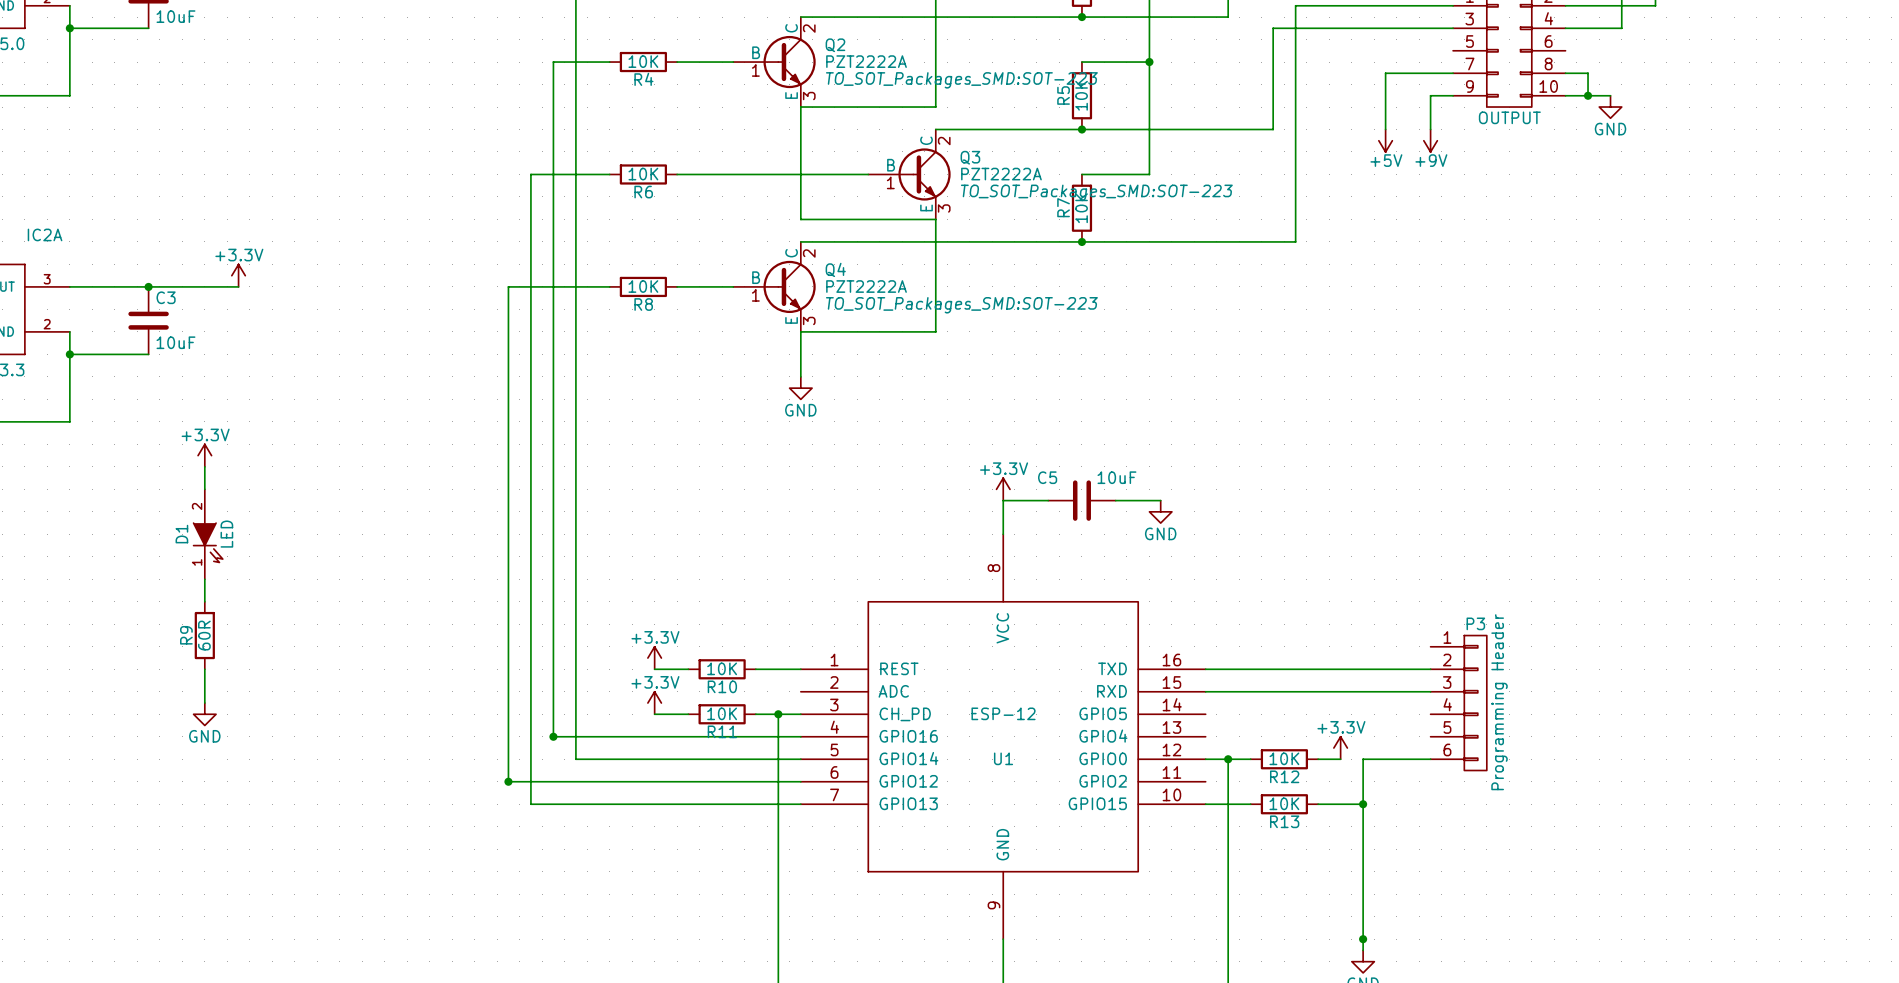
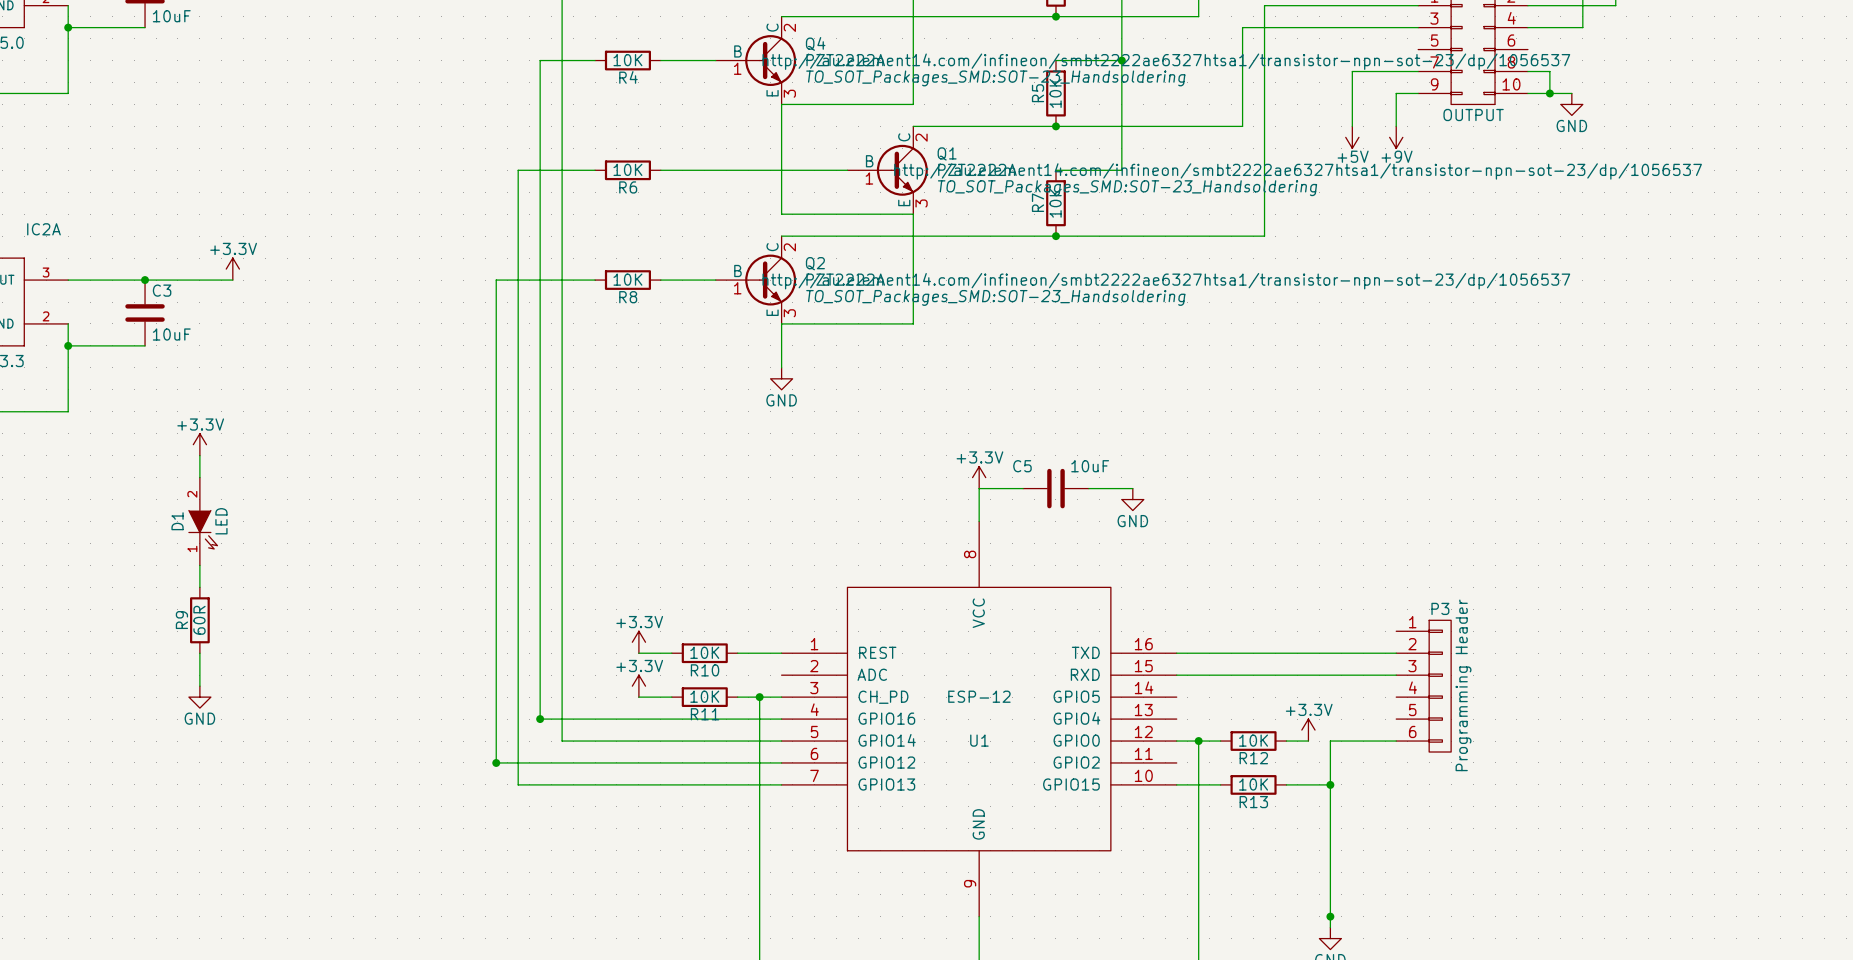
Q2 name: Q2 (835, 45) -> Q4 (815, 43)
Q2 text: none -> http://au.element14.com/infineon/smbt2222ae6327htsa1/transistor-npn-sot-23/dp/1056537 (1166, 61)
Q2 text: TO_SOT_Packages_SMD:SOT-223 (961, 80) -> TO_SOT_Packages_SMD:SOT-23_Handsoldering (995, 78)
Q3 name: Q3 (970, 157) -> Q1 (947, 153)
Q3 text: none -> http://au.element14.com/infineon/smbt2222ae6327htsa1/transistor-npn-sot-23/dp/1056537 (1298, 171)
Q3 text: TO_SOT_Packages_SMD:SOT-223 (1096, 192) -> TO_SOT_Packages_SMD:SOT-23_Handsoldering (1127, 188)
Q4 name: Q4 (835, 269) -> Q2 (815, 263)
Q4 text: none -> http://au.element14.com/infineon/smbt2222ae6327htsa1/transistor-npn-sot-23/dp/1056537 (1166, 281)
Q4 text: TO_SOT_Packages_SMD:SOT-223 (961, 305) -> TO_SOT_Packages_SMD:SOT-23_Handsoldering (995, 297)

